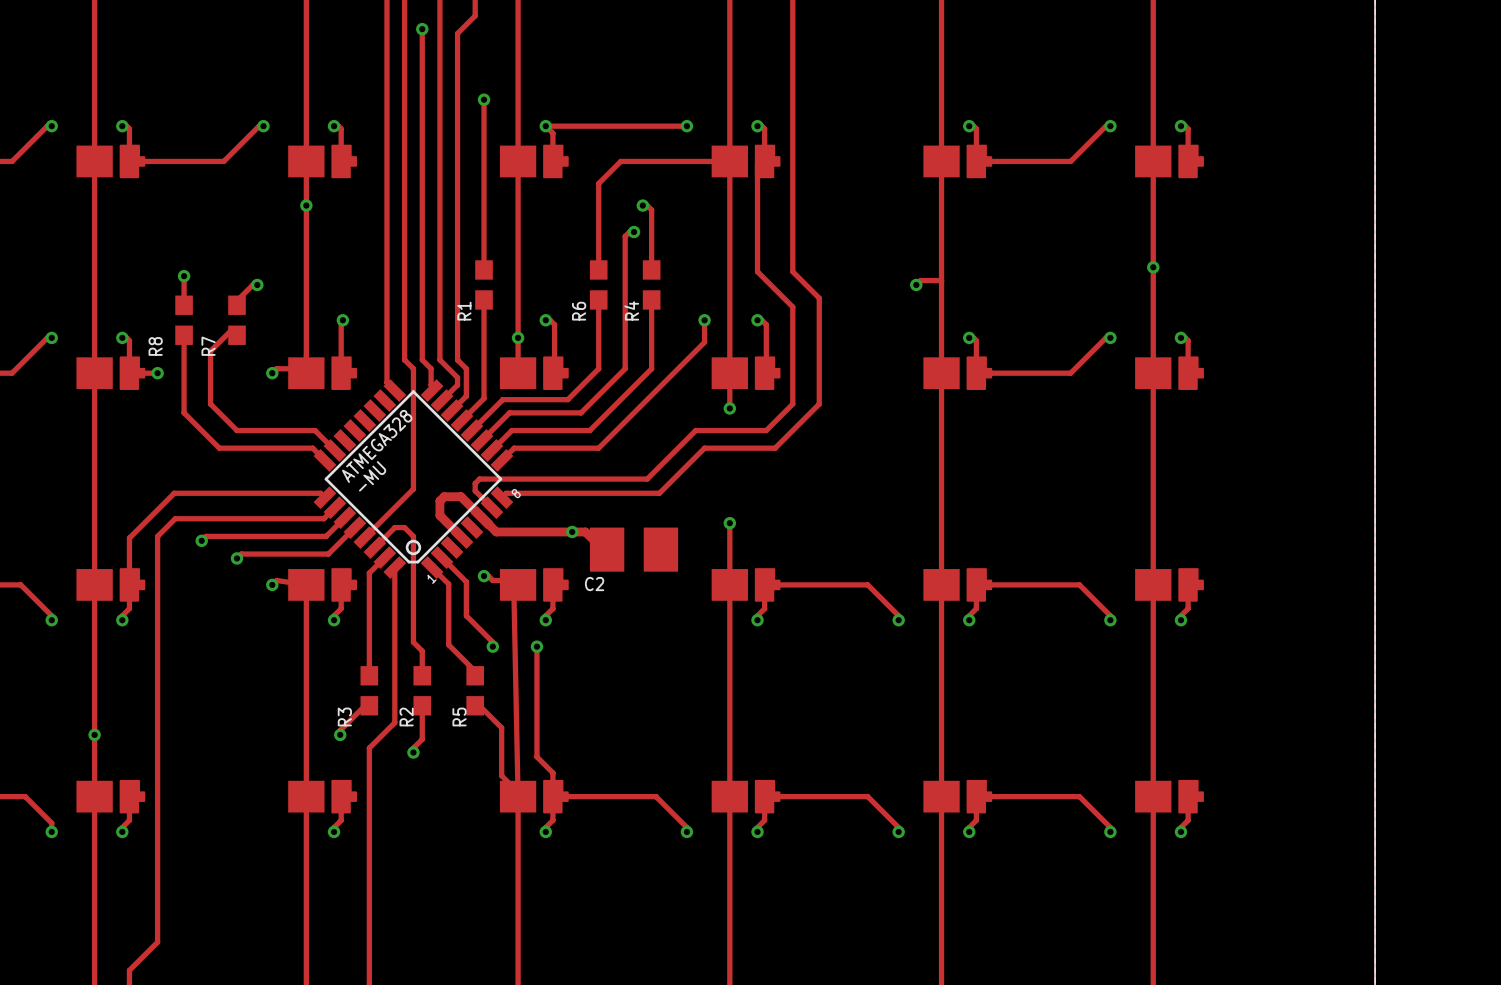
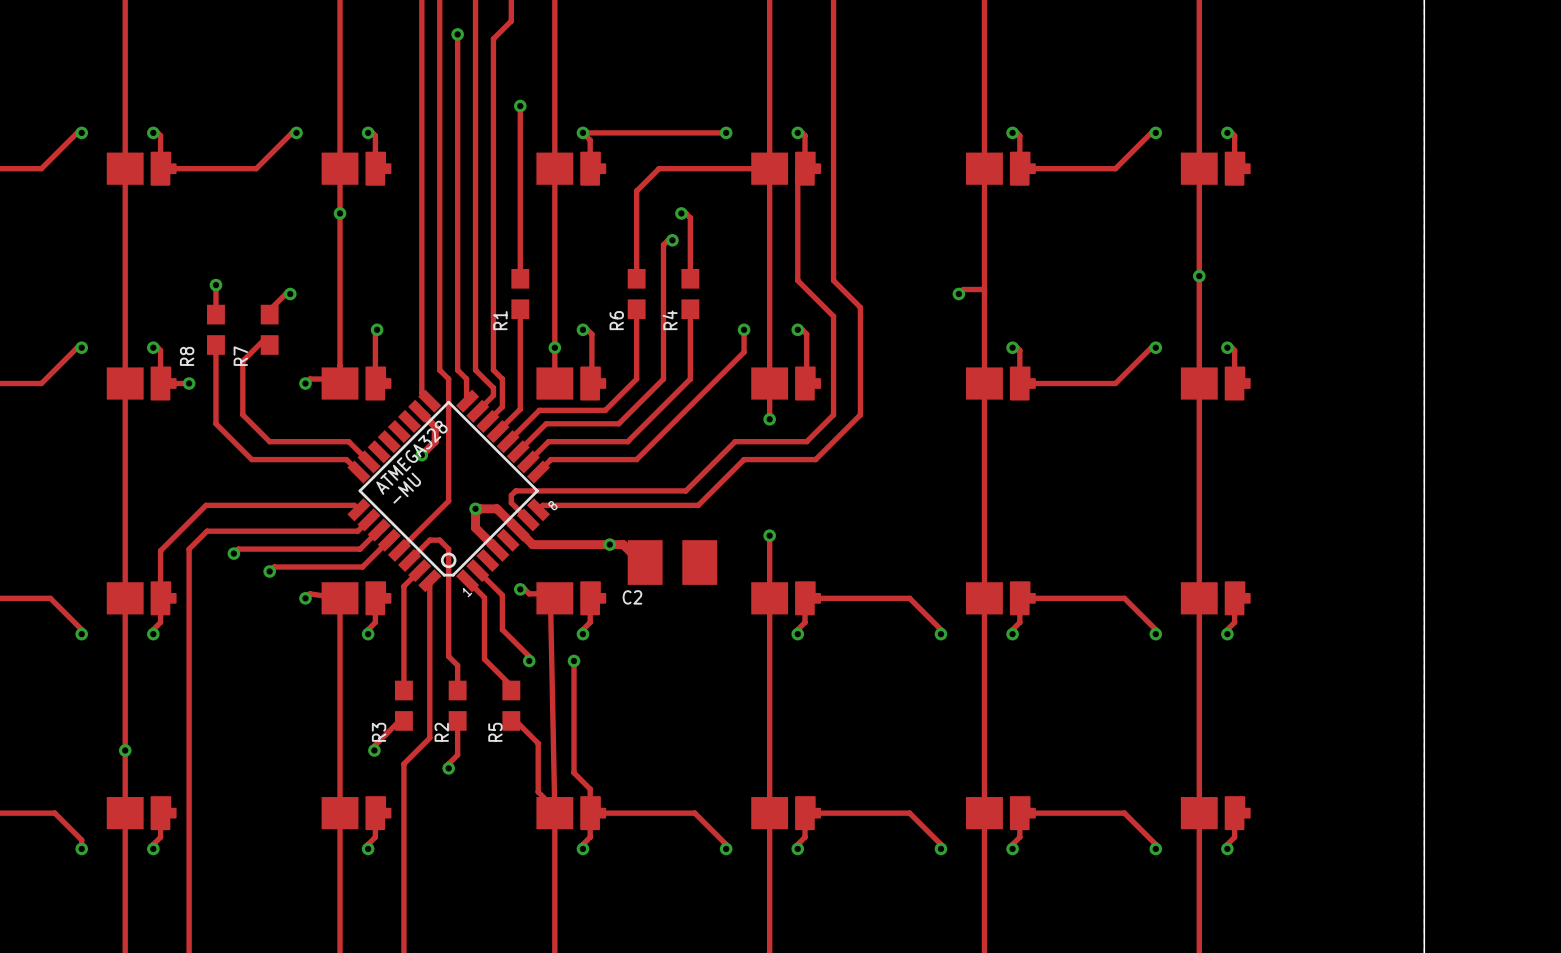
track: none -> (419, 411) (435, 426) (435, 441) (421, 455)
via: none -> (421, 455)
via: none -> (475, 508)

